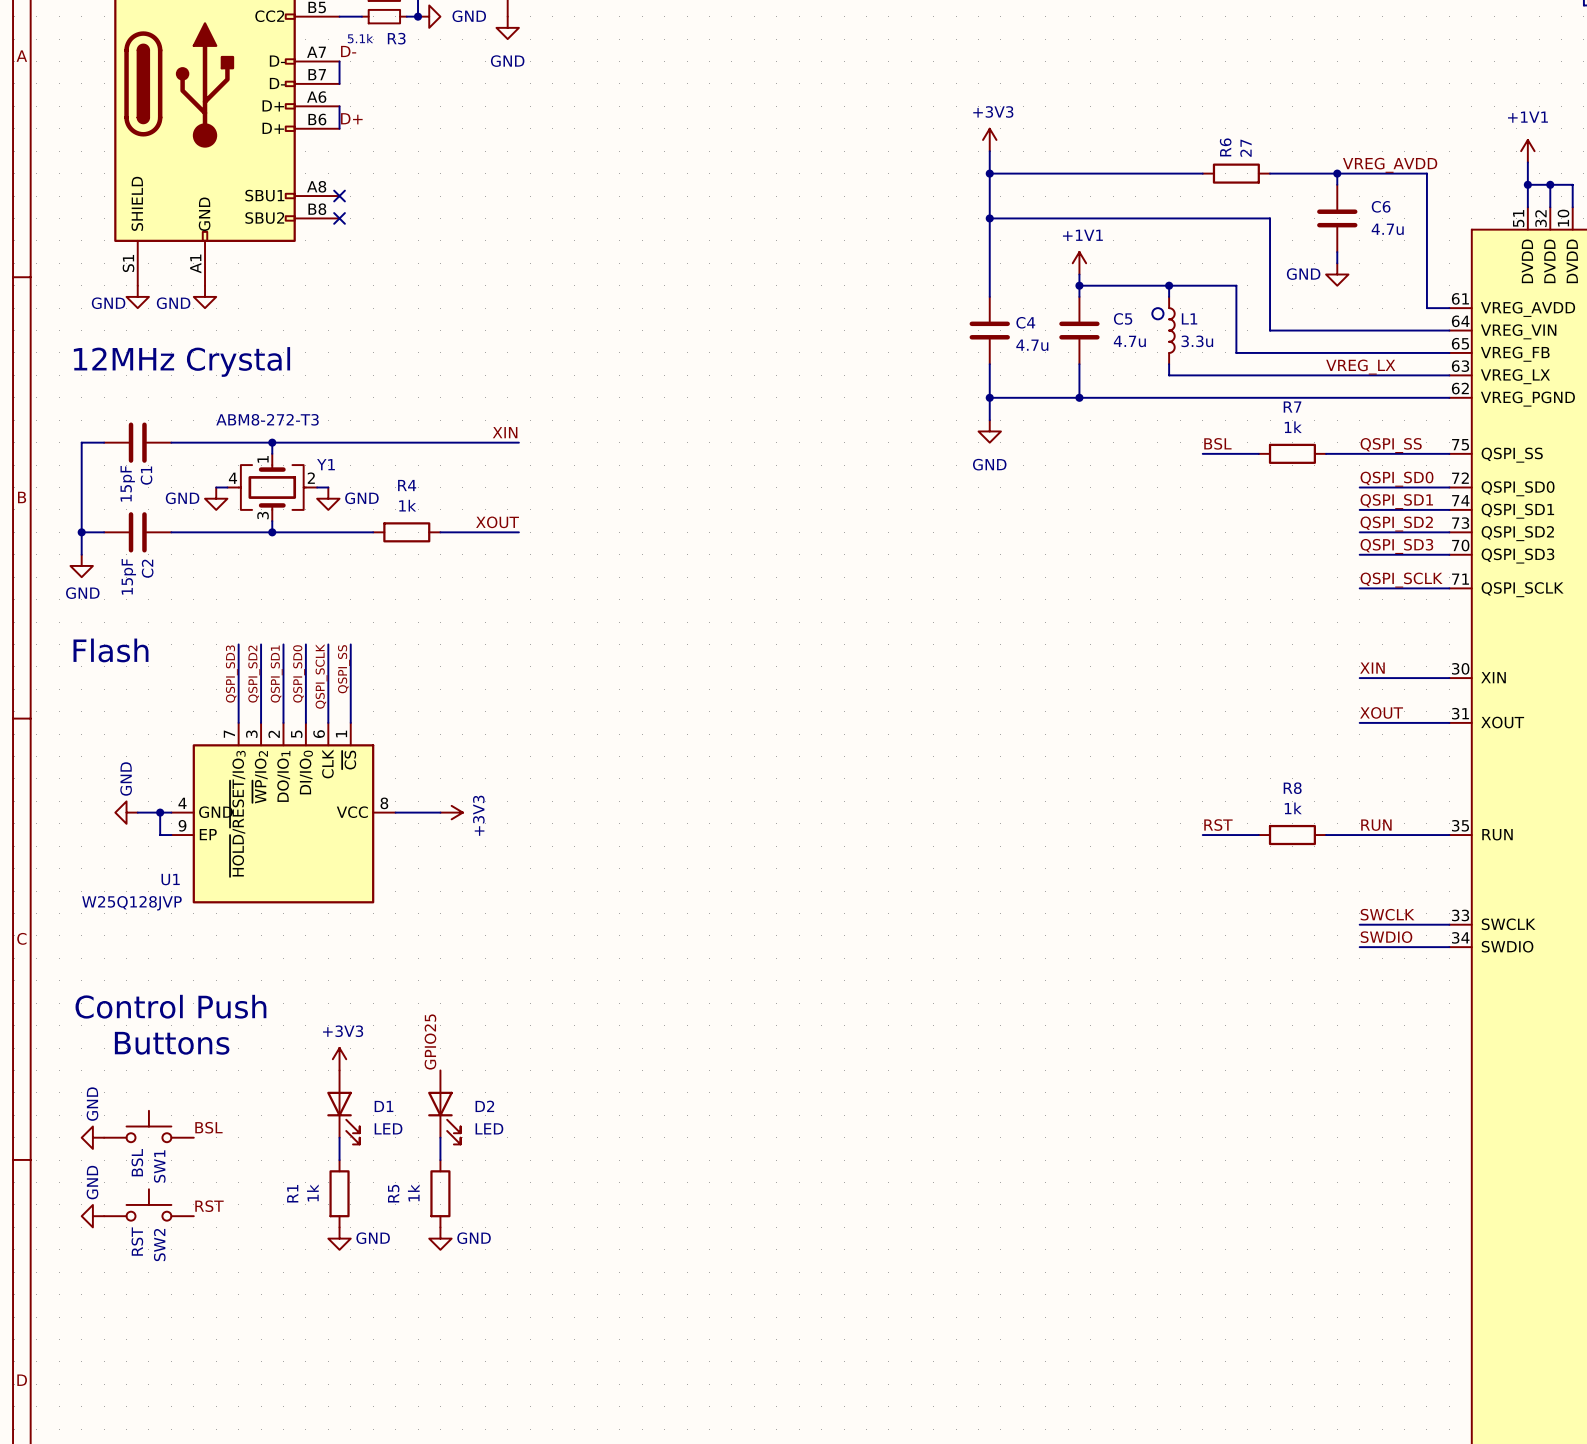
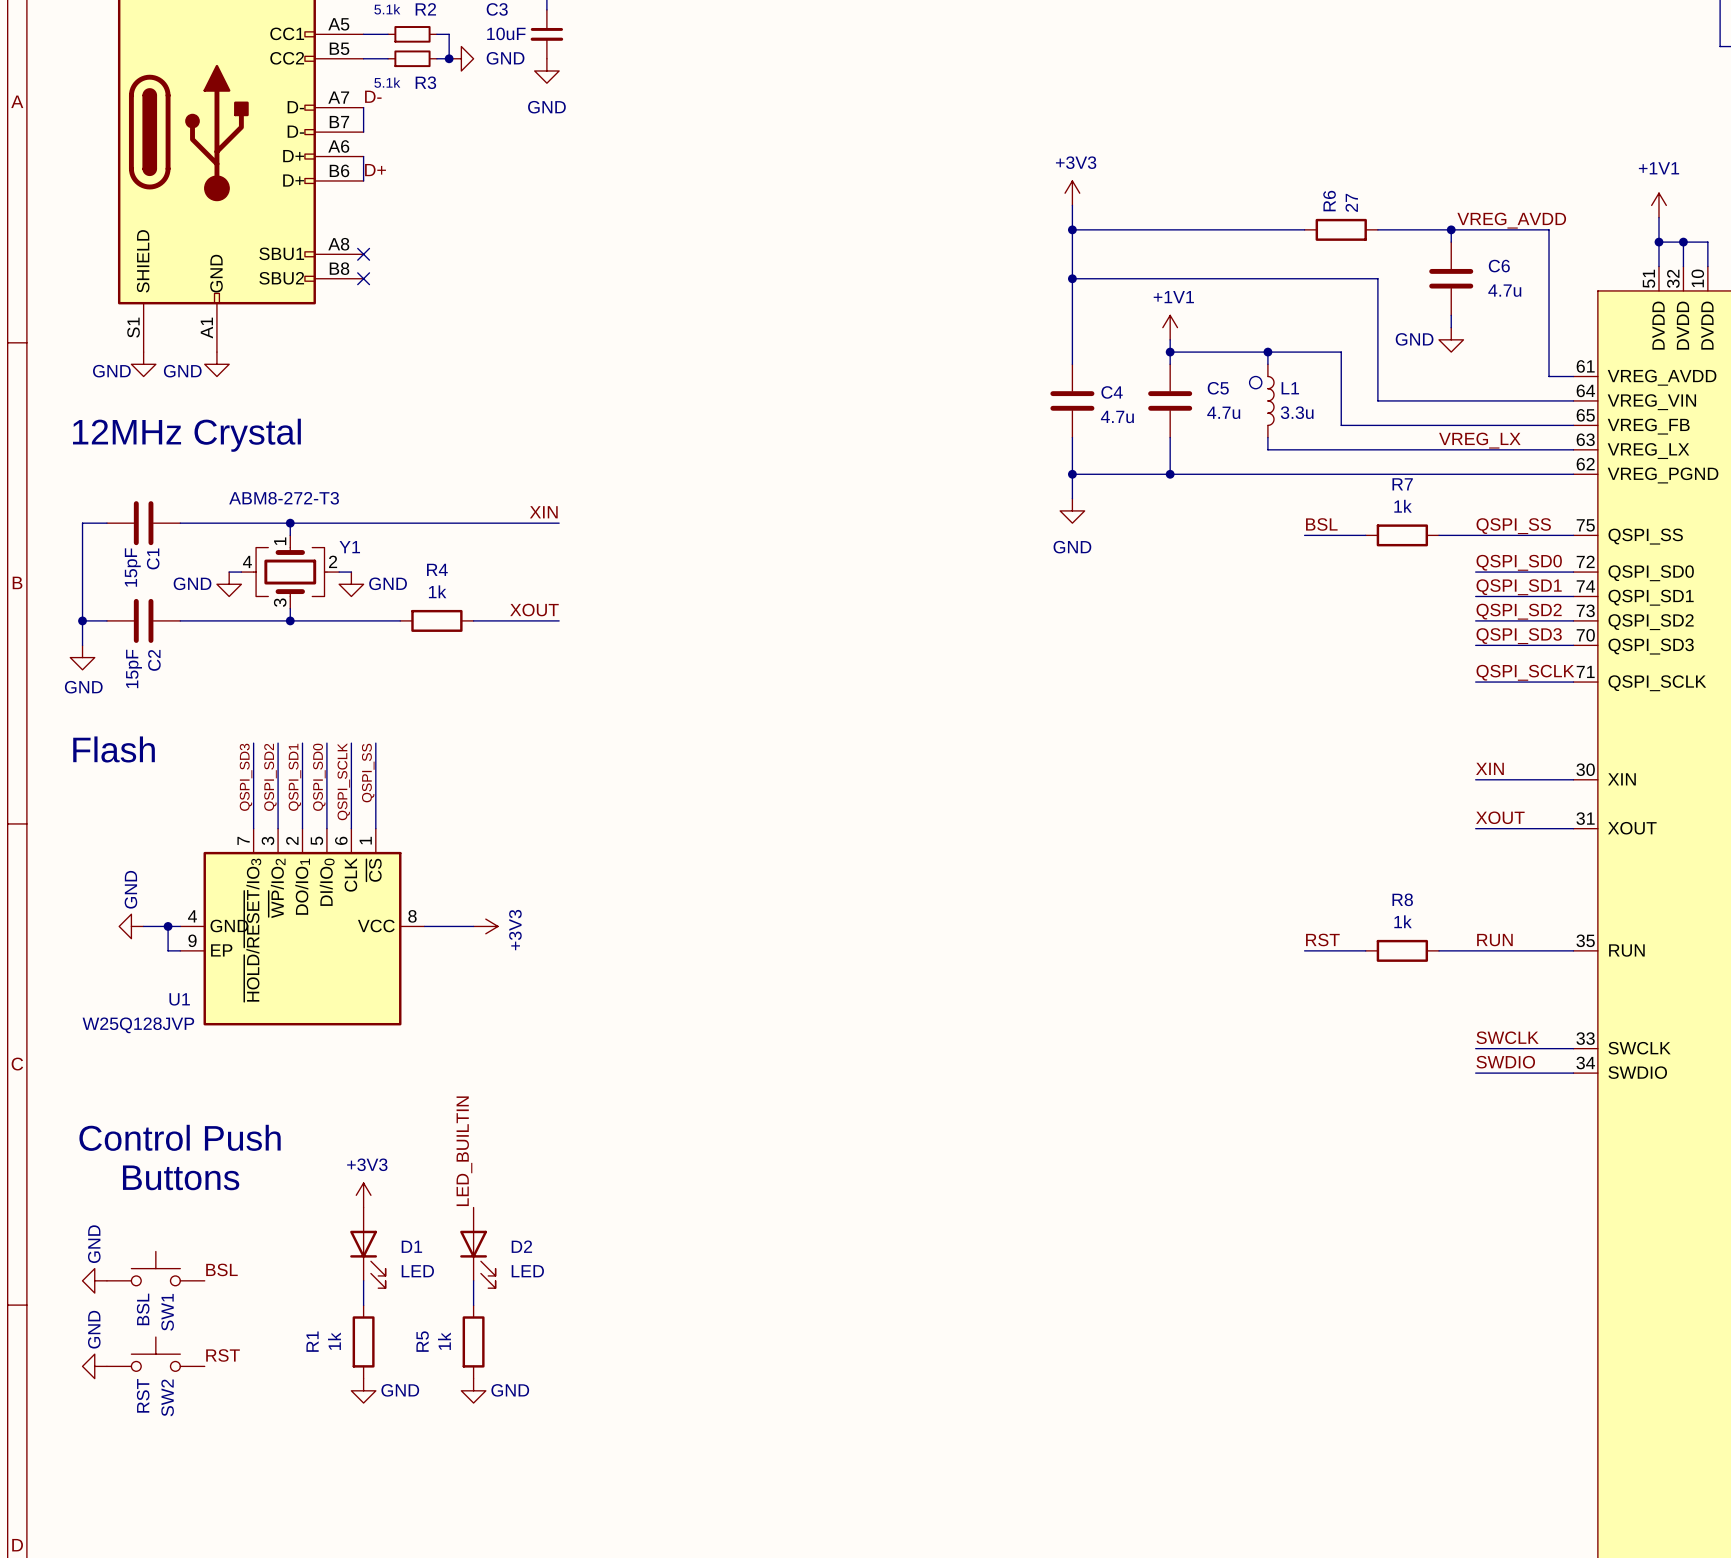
label: GPIO25 (430, 1041) -> LED_BUILTIN (464, 1151)

